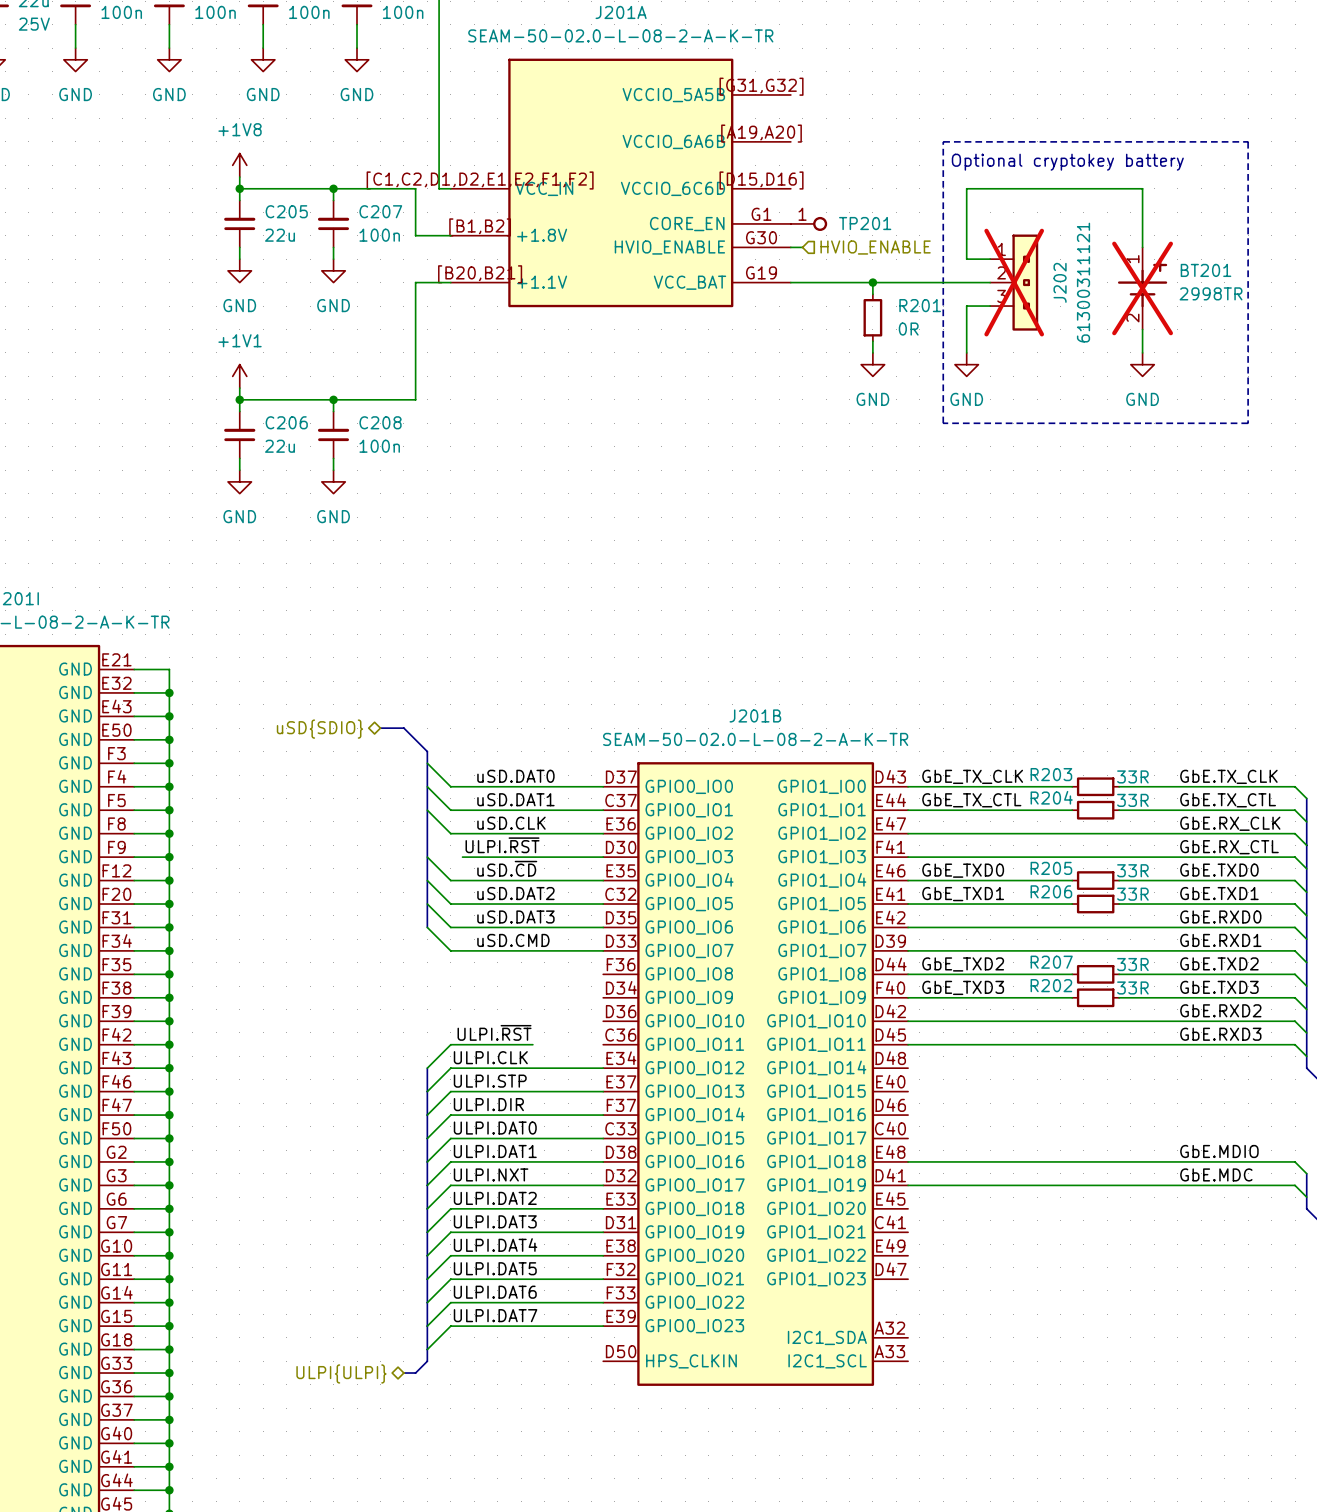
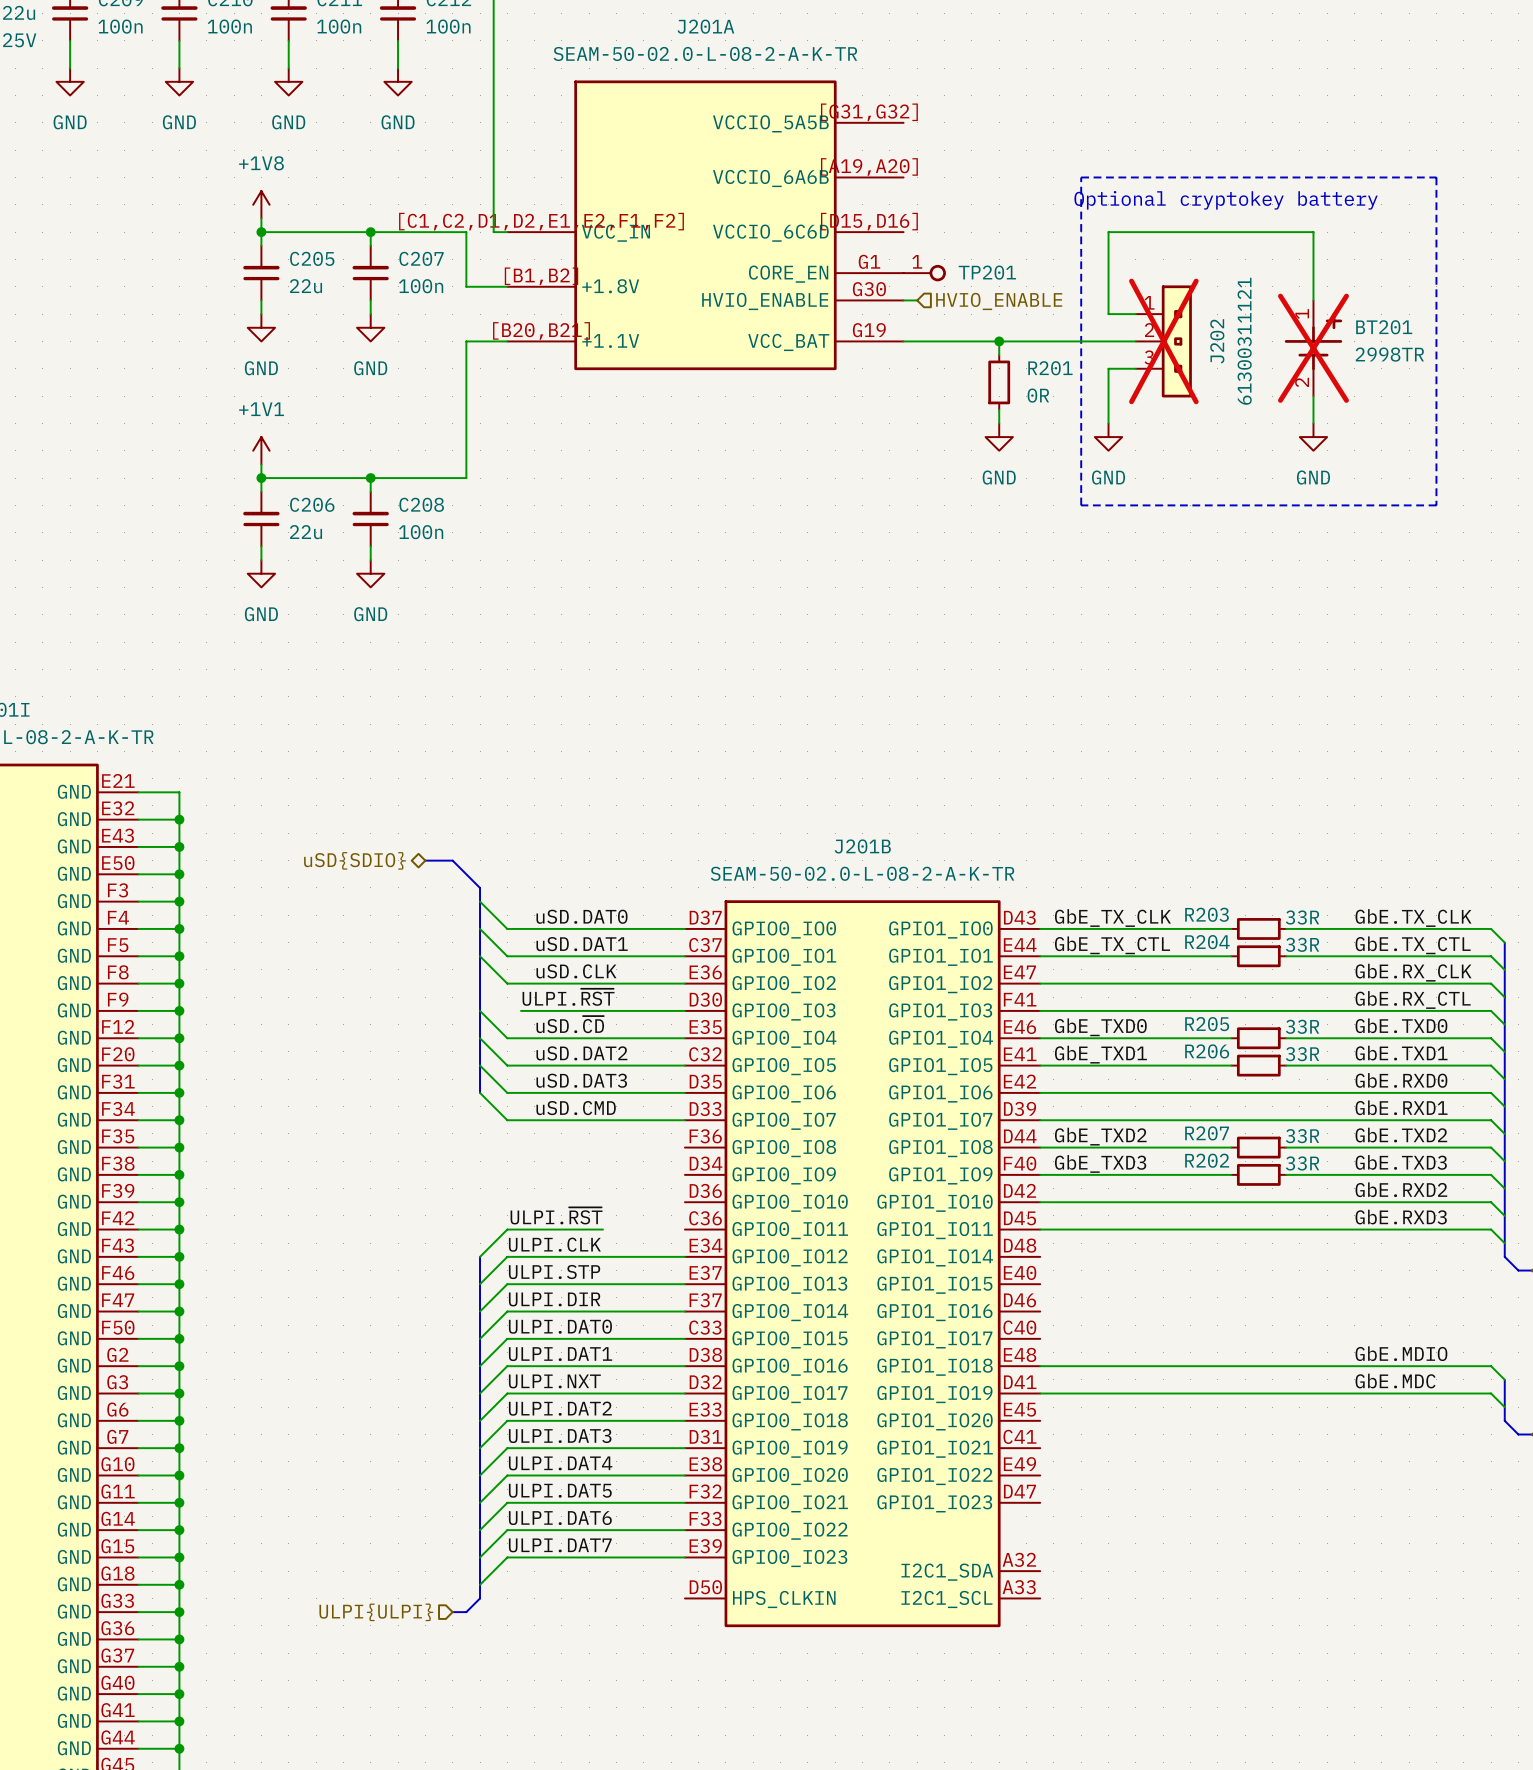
hierarchical label shape: bidirectional (341, 1373) -> input (376, 1612)

